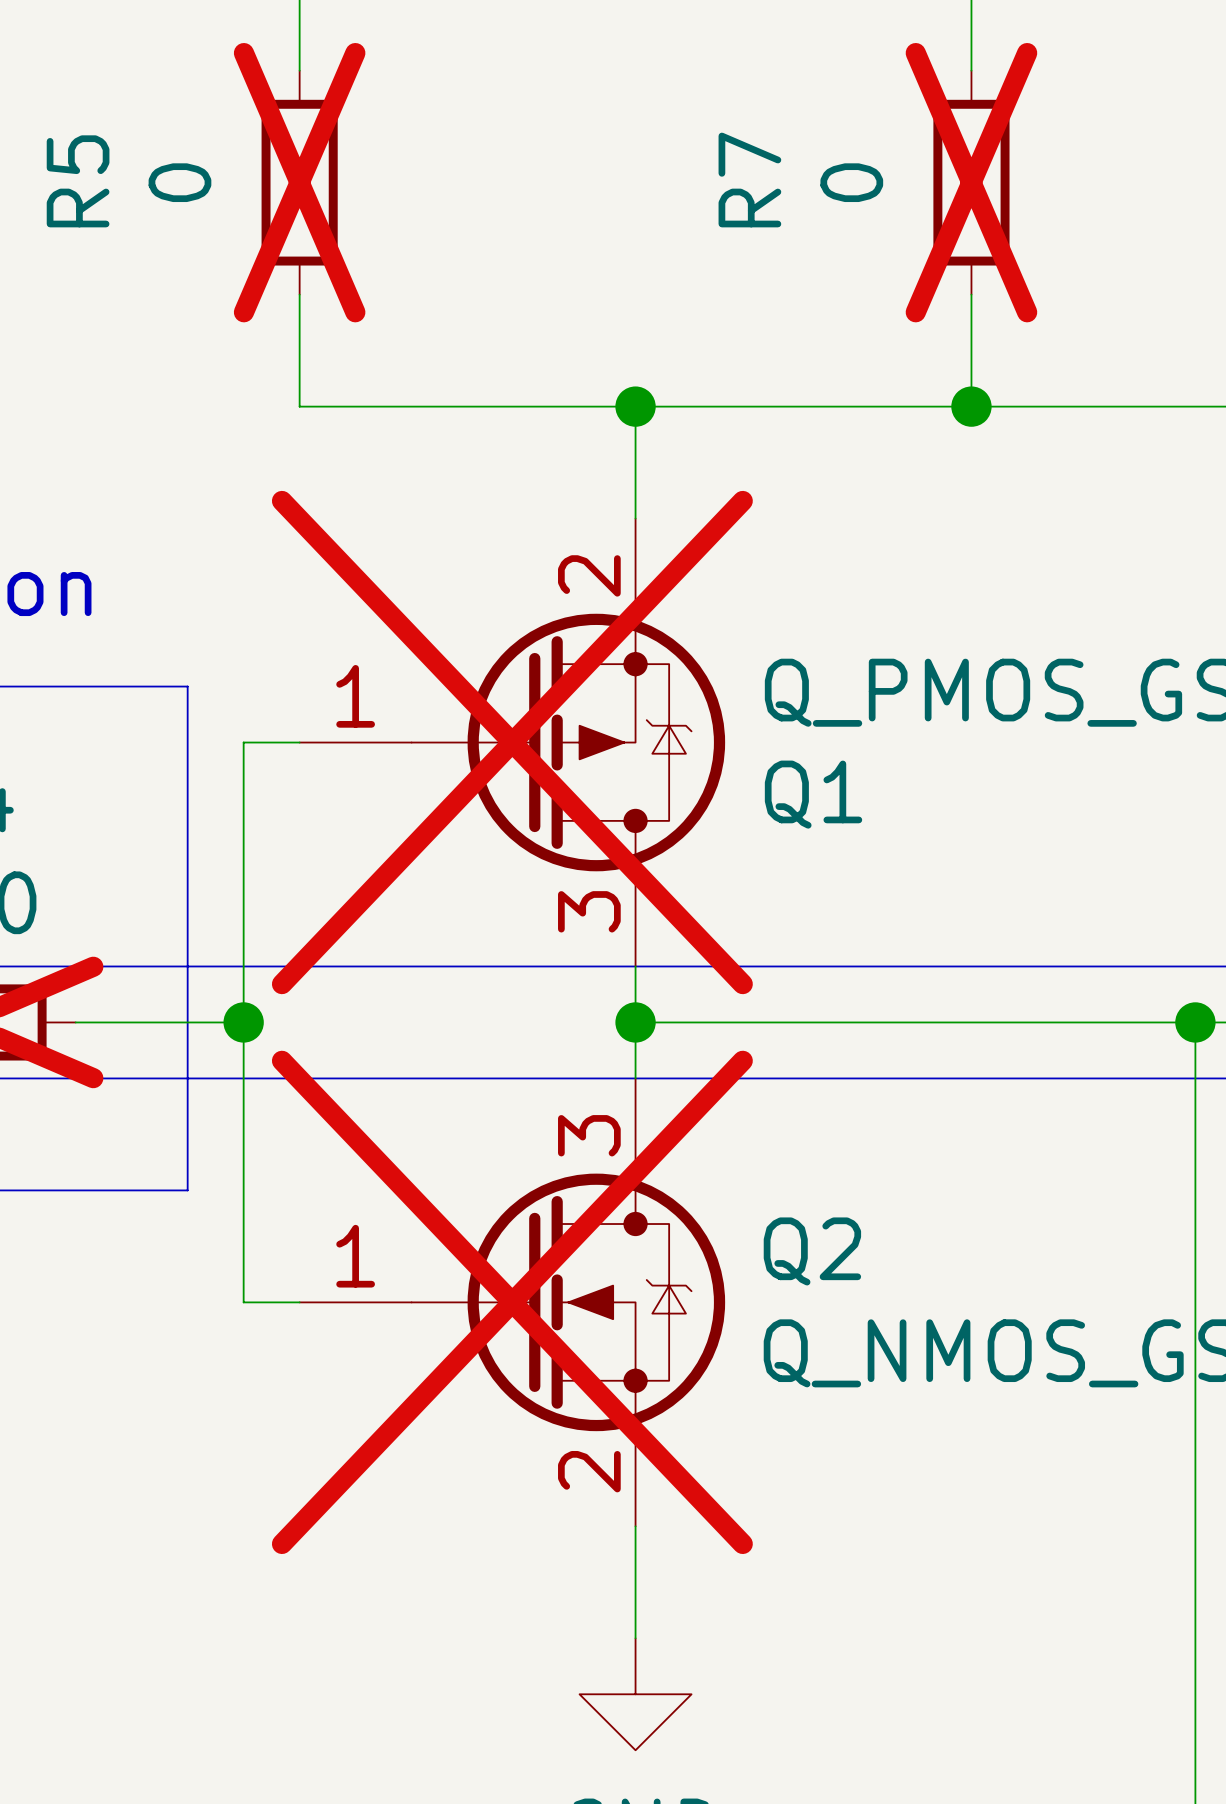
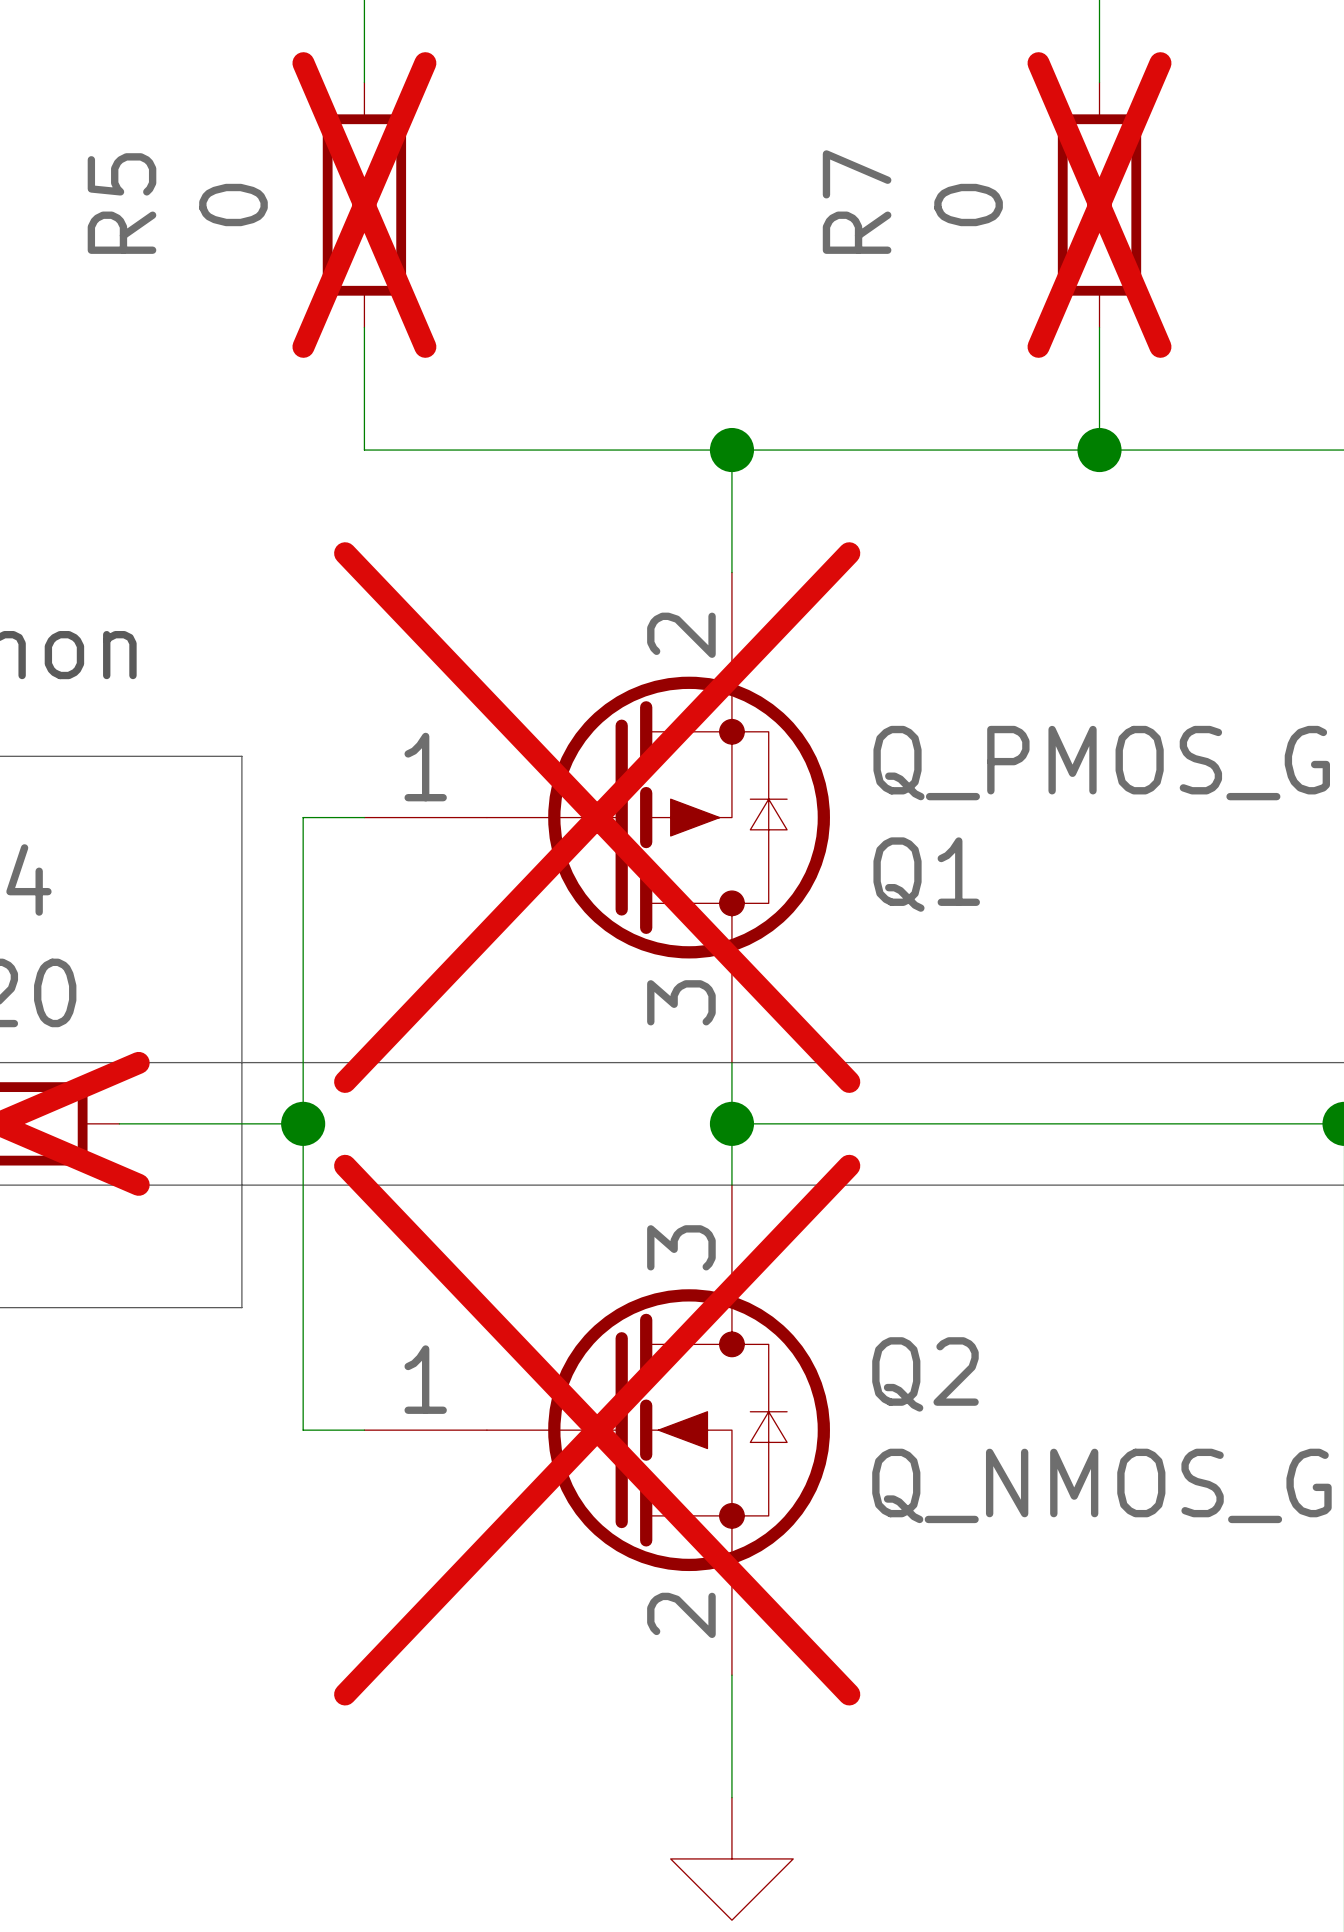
Q1 symbol: [299, 518, 726, 967] -> [364, 572, 830, 1063]
Q2 symbol: [299, 1078, 726, 1527] -> [364, 1185, 830, 1676]

